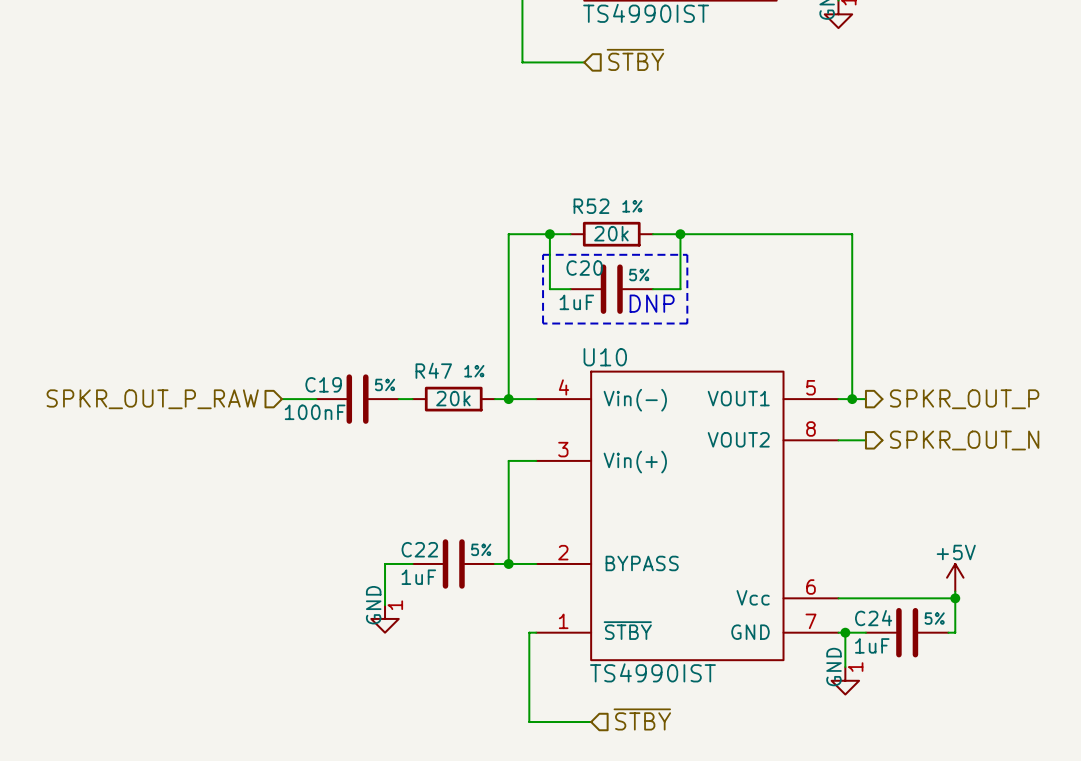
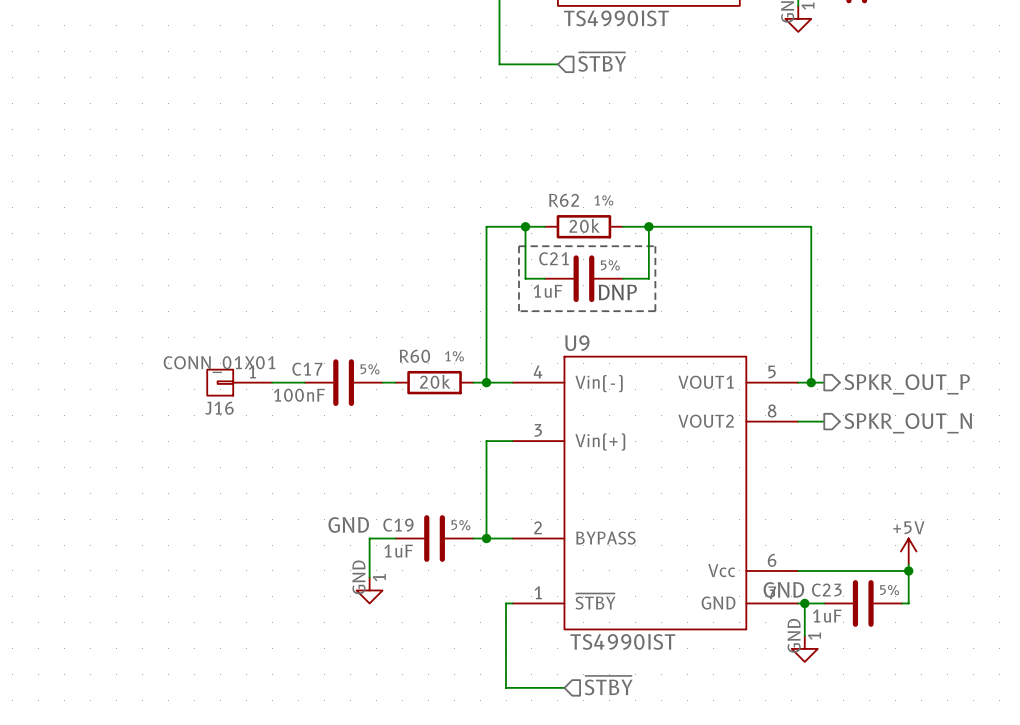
R52 name: R52 (591, 206) -> R62 (564, 200)
C20 name: C20 (584, 268) -> C21 (554, 258)
U10 name: U10 (605, 357) -> U9 (577, 343)
R47 name: R47 (433, 370) -> R60 (414, 356)
C19 name: C19 (323, 384) -> C17 (307, 369)
hierarchical label: SPKR_OUT_P_RAW (152, 399) -> none
J16: none -> CONN_01X01 (239, 382)
label: none -> GND (348, 525)
C22 name: C22 (419, 549) -> C19 (398, 525)
label: none -> GND (783, 589)
C24 name: C24 (873, 618) -> C23 (826, 590)

